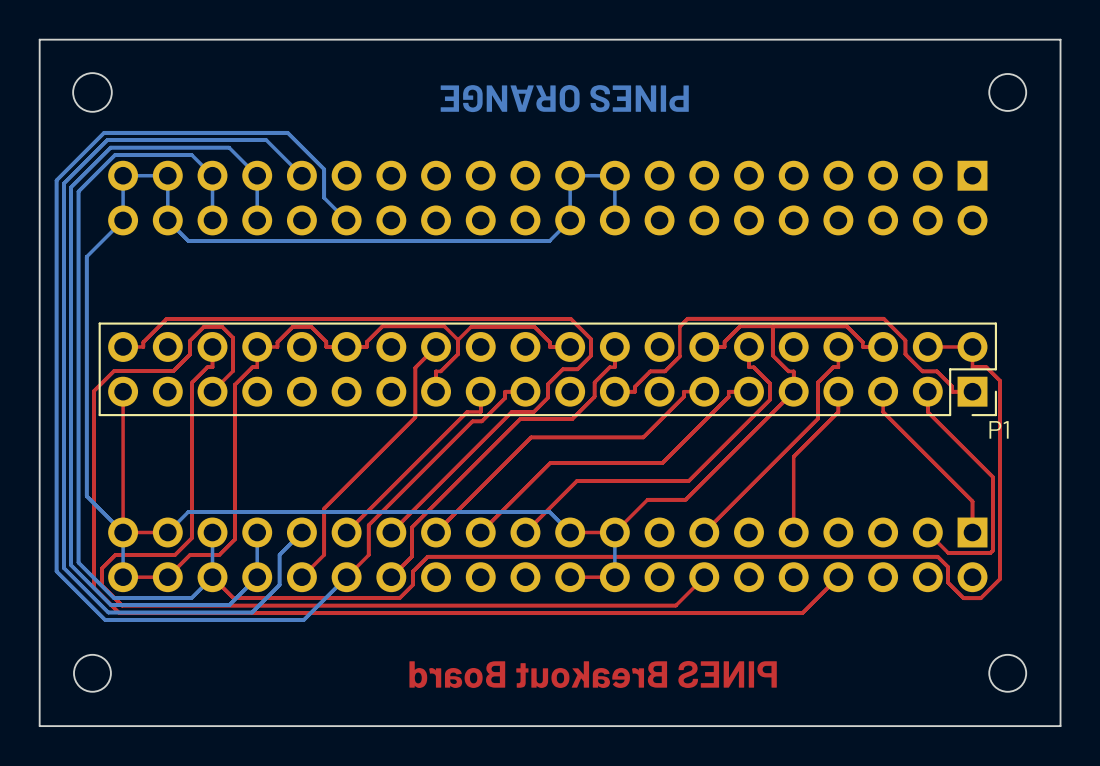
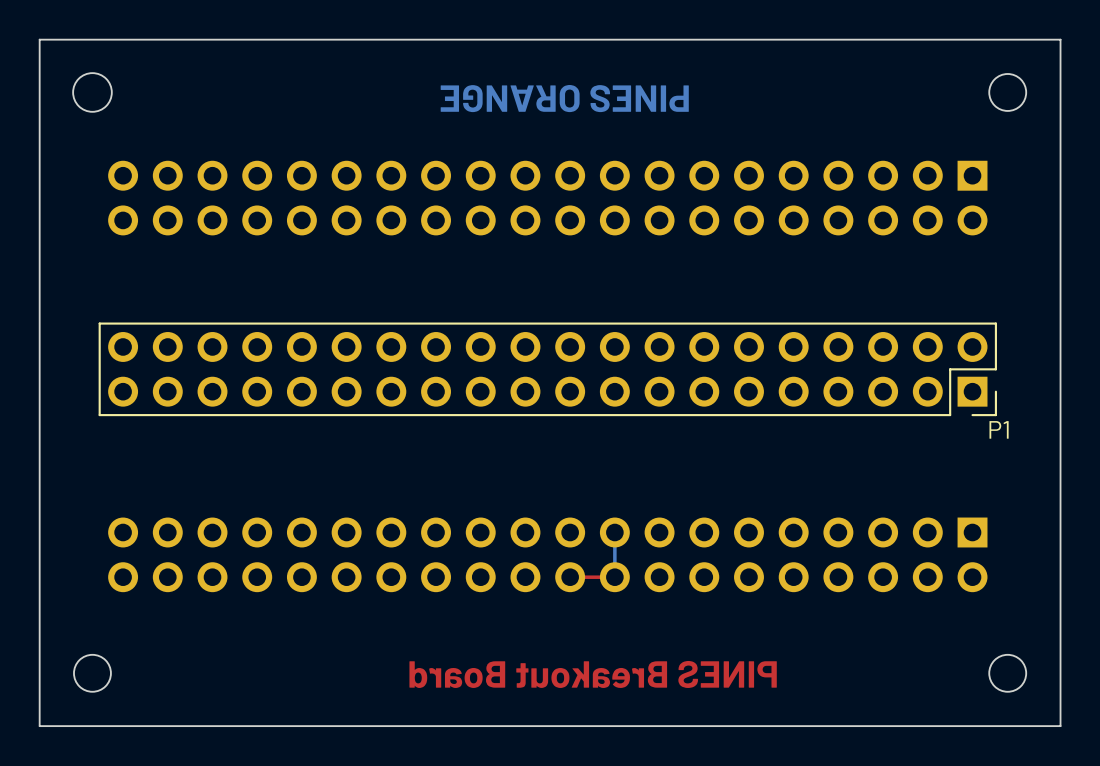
bottom track: (301, 175) (266, 140) (107, 140) (63, 183) (63, 567) (108, 612) (252, 612) (279, 585) (279, 554) (301, 532) -> none
bottom track: (212, 220) (212, 175) (191, 155) (114, 155) (78, 191) (78, 562) (113, 597) (191, 597) (212, 577) (212, 532) -> none
bottom track: (257, 220) (257, 175) (229, 147) (110, 147) (71, 187) (71, 565) (110, 605) (229, 605) (257, 577) (257, 532) -> none
bottom track: (346, 220) (324, 198) (324, 169) (287, 132) (104, 132) (56, 180) (56, 571) (104, 619) (304, 619) (346, 577) -> none
bottom track: (614, 220) (614, 175) (570, 175) (570, 220) (549, 240) (188, 240) (167, 220) (167, 175) (123, 175) (123, 220) (86, 256) (86, 496) (123, 532) (123, 577) -> none
top track: (772, 326) (772, 355) (788, 371) (793, 371) (793, 391) (685, 499) (647, 499) (614, 532) (570, 532) -> none
top track: (458, 340) (458, 354) (440, 371) (436, 371) (436, 391) -> none
top track: (458, 340) (444, 326) (382, 326) (366, 341) (366, 346) (326, 346) (326, 341) (311, 326) (293, 326) (277, 342) (277, 346) (257, 346) (257, 367) (252, 367) (234, 384) (234, 539) (219, 554) (190, 554) (167, 577) (123, 577) -> none
top track: (458, 340) (471, 326) (534, 326) (549, 342) (549, 346) (570, 346) -> none
top track: (123, 346) (143, 346) (143, 342) (166, 319) (571, 319) (590, 338) (590, 356) (577, 369) (562, 369) (547, 384) (547, 398) (533, 411) (511, 411) (391, 532) -> none
top track: (212, 346) (212, 367) (207, 367) (192, 382) (192, 537) (175, 554) (115, 554) (102, 568) (102, 585) (122, 605) (675, 605) (704, 577) -> none
top track: (436, 346) (415, 367) (415, 417) (324, 508) (324, 554) (301, 577) -> none
top track: (614, 346) (614, 367) (609, 367) (594, 382) (594, 396) (572, 419) (520, 419) (412, 527) (412, 556) (391, 577) -> none
top track: (748, 346) (748, 367) (753, 367) (770, 383) (770, 399) (688, 480) (577, 480) (525, 532) -> none
top track: (838, 346) (838, 367) (833, 367) (818, 382) (818, 418) (704, 532) -> none
top track: (883, 346) (862, 346) (862, 342) (846, 326) (740, 326) (724, 341) (724, 346) (704, 346) -> none
top track: (927, 346) (972, 346) (972, 367) (986, 367) (999, 380) (999, 579) (980, 598) (963, 598) (948, 582) (948, 567) (937, 556) (427, 556) (413, 571) (413, 584) (399, 597) (233, 597) (212, 577) -> none
top track: (123, 391) (123, 532) (167, 532) -> none
top track: (212, 391) (233, 370) (233, 337) (221, 326) (204, 326) (190, 340) (190, 354) (173, 370) (114, 370) (94, 391) (94, 587) (119, 613) (802, 613) (838, 577) -> none
top track: (480, 391) (480, 411) (467, 411) (346, 532) -> none
top track: (525, 391) (505, 391) (505, 397) (481, 421) (472, 421) (368, 525) (368, 555) (346, 577) -> none
top track: (704, 391) (684, 391) (684, 396) (643, 437) (531, 437) (436, 532) -> none
top track: (748, 391) (728, 391) (728, 396) (662, 463) (550, 463) (480, 532) -> none
top track: (838, 391) (838, 411) (793, 456) (793, 532) -> none
top track: (883, 391) (883, 411) (972, 501) (972, 532) -> none
top track: (927, 391) (927, 411) (992, 476) (992, 550) (990, 553) (948, 553) (927, 532) -> none
top track: (972, 391) (952, 391) (952, 386) (937, 371) (922, 371) (905, 354) (905, 340) (883, 318) (687, 318) (679, 326) (679, 356) (664, 371) (650, 371) (635, 386) (635, 391) (614, 391) -> none
bottom track: (570, 532) (549, 511) (188, 511) (167, 532) -> none

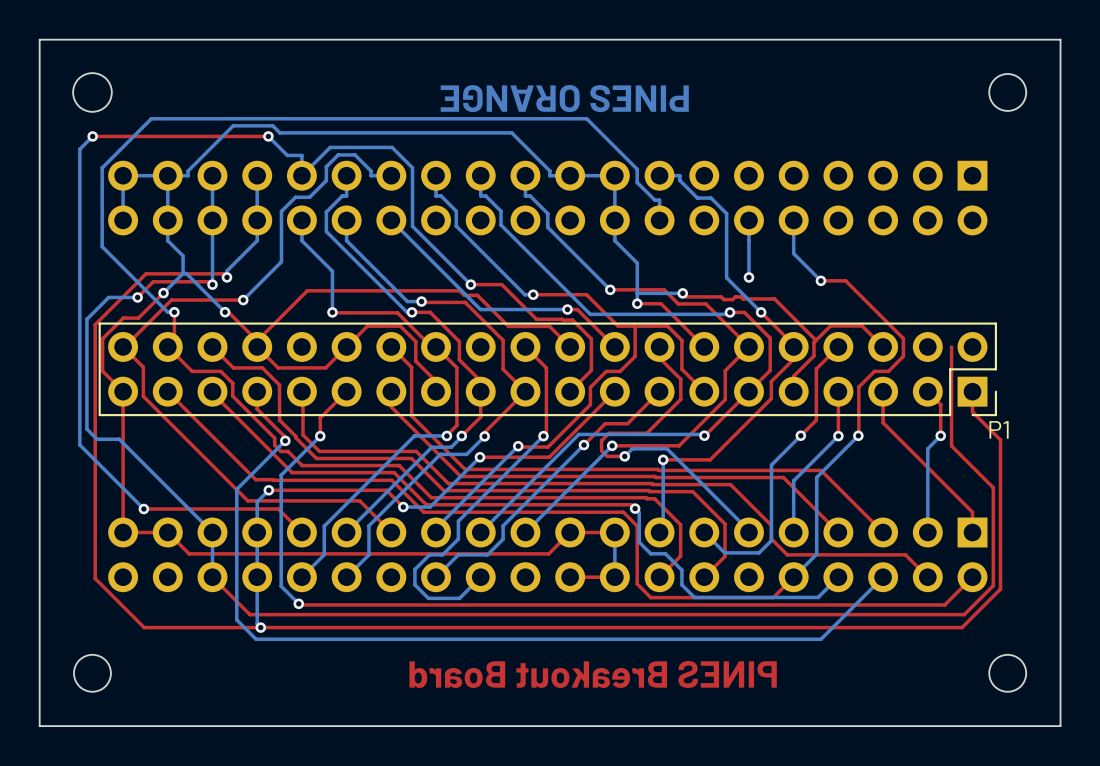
bottom track: none -> (92, 136) (79, 149) (79, 444) (143, 509)
via: none -> (92, 136)
top track: none -> (268, 136) (92, 136)
bottom track: none -> (268, 136) (287, 155) (301, 155) (301, 175) (330, 147) (392, 147) (412, 167) (412, 226) (470, 284)
via: none -> (268, 136)
bottom track: none -> (167, 175) (167, 240) (183, 255) (183, 273)
bottom track: none -> (212, 175) (212, 284)
bottom track: none -> (257, 175) (257, 240) (226, 270) (226, 277)
bottom track: none -> (346, 175) (346, 195) (342, 195) (326, 212) (326, 231) (407, 312) (411, 312)
bottom track: none -> (391, 175) (371, 175) (371, 171) (355, 154) (338, 154) (326, 166) (326, 180) (309, 197) (295, 197) (281, 211) (281, 261) (243, 300)
bottom track: none -> (436, 175) (436, 195) (441, 195) (456, 211) (456, 226) (524, 294) (533, 294)
bottom track: none -> (480, 175) (480, 195) (485, 195) (501, 211) (501, 225) (590, 314) (728, 314) (729, 312)
bottom track: none -> (525, 175) (525, 195) (530, 195) (547, 213) (547, 227) (610, 289)
bottom track: none -> (659, 175) (679, 175) (679, 180) (697, 198) (711, 198) (726, 213) (726, 277) (761, 312)
bottom track: none -> (123, 220) (123, 175) (188, 175) (188, 171) (233, 125) (272, 125) (279, 132) (511, 132) (549, 171) (549, 175) (614, 175) (614, 240) (637, 263) (637, 303)
bottom track: none -> (301, 220) (301, 240) (332, 271) (332, 312)
bottom track: none -> (346, 220) (346, 240) (407, 301) (421, 301)
bottom track: none -> (391, 220) (480, 309) (567, 309)
bottom track: none -> (659, 220) (659, 200) (654, 200) (637, 182) (637, 169) (586, 118) (151, 118) (102, 167) (102, 246) (167, 312) (174, 312)
bottom track: none -> (748, 220) (748, 277)
bottom track: none -> (793, 220) (793, 253) (820, 280)
bottom track: none -> (183, 273) (163, 293)
bottom track: none -> (183, 273) (186, 273) (225, 312)
top track: none -> (226, 277) (223, 273) (146, 273) (95, 324) (95, 578) (144, 627) (962, 627) (1000, 589) (1000, 439) (972, 411) (972, 391)
via: none -> (226, 277)
via: none -> (748, 277)
top track: none -> (820, 280) (845, 280) (903, 338) (903, 356) (888, 371) (874, 371) (858, 387) (858, 435)
via: none -> (820, 280)
top track: none -> (212, 284) (209, 281) (153, 281) (137, 297)
via: none -> (212, 284)
top track: none -> (470, 284) (501, 284) (536, 319) (572, 320) (591, 338) (591, 370) (570, 391)
via: none -> (470, 284)
top track: none -> (610, 289) (664, 289) (678, 303) (705, 303) (748, 346) (725, 370) (725, 399) (679, 445) (612, 445)
via: none -> (610, 289)
top track: none -> (163, 293) (138, 318) (123, 318) (102, 338) (102, 371) (123, 391) (123, 532) (167, 532) (189, 553) (548, 553) (570, 532) (614, 532)
via: none -> (163, 293)
top track: none -> (682, 293) (686, 296) (721, 296) (723, 299) (732, 299) (735, 296) (742, 298) (774, 298) (816, 340)
bottom track: none -> (682, 293) (637, 293)
via: none -> (682, 293)
top track: none -> (533, 294) (586, 294) (618, 326) (667, 326) (681, 340) (681, 369) (704, 391)
via: none -> (533, 294)
bottom track: none -> (137, 297) (108, 297) (86, 319) (86, 429) (97, 439) (119, 439) (212, 532) (212, 577)
via: none -> (137, 297)
top track: none -> (243, 300) (171, 300) (123, 346) (143, 367) (143, 396) (247, 500) (359, 500) (391, 532)
via: none -> (243, 300)
top track: none -> (421, 301) (465, 302) (503, 340) (503, 369) (525, 391) (484, 432) (484, 436)
via: none -> (421, 301)
top track: none -> (637, 303) (661, 303) (704, 346)
via: none -> (637, 303)
top track: none -> (567, 309) (577, 309) (614, 346)
via: none -> (567, 309)
top track: none -> (174, 312) (174, 340) (167, 346) (192, 371) (220, 371) (232, 383) (232, 396) (274, 438) (274, 445) (280, 451) (288, 451) (302, 465) (399, 465) (431, 497) (654, 498) (680, 524) (680, 556) (659, 577)
via: none -> (174, 312)
top track: none -> (225, 312) (228, 312) (257, 340)
via: none -> (225, 312)
top track: none -> (332, 312) (397, 312) (431, 346) (436, 346) (456, 367) (456, 425) (446, 435)
via: none -> (332, 312)
top track: none -> (411, 312) (430, 312) (459, 341) (459, 359) (480, 381) (480, 417) (461, 435)
via: none -> (411, 312)
top track: none -> (729, 312) (744, 312) (770, 338) (770, 370) (704, 435)
via: none -> (729, 312)
top track: none -> (761, 312) (793, 344) (793, 359) (771, 381) (771, 398) (710, 459) (663, 459)
via: none -> (761, 312)
top track: none -> (635, 326) (635, 356) (620, 371) (606, 371) (590, 387) (590, 404) (548, 447) (518, 446)
top track: none -> (257, 340) (257, 346) (278, 367) (325, 367) (367, 326) (400, 326) (415, 341) (415, 361) (436, 381) (436, 391)
top track: none -> (257, 340) (307, 290) (459, 290) (464, 295) (477, 295) (508, 326) (549, 326) (570, 346)
top track: none -> (816, 340) (813, 342) (813, 355) (793, 376) (793, 391)
top track: none -> (816, 340) (830, 325) (862, 325) (883, 346)
top track: none -> (212, 346) (233, 367) (262, 367) (279, 385) (279, 420) (316, 458) (411, 458) (443, 490) (692, 491) (724, 523) (724, 556) (704, 577)
top track: none -> (391, 346) (411, 367) (411, 415) (465, 469) (821, 470) (883, 532)
top track: none -> (525, 346) (546, 367) (546, 433) (543, 436)
top track: none -> (659, 346) (659, 358) (680, 379) (680, 399) (646, 433) (609, 433) (601, 440) (601, 450) (607, 456) (624, 456)
top track: none -> (838, 346) (816, 369) (816, 420) (800, 435)
top track: none -> (951, 346) (951, 445) (993, 487) (993, 585) (964, 614) (249, 614) (212, 577)
top track: none -> (167, 391) (255, 479) (391, 480) (423, 512) (623, 512) (637, 526) (637, 584) (650, 597) (773, 597) (793, 577)
top track: none -> (212, 391) (292, 472) (394, 472) (426, 504) (631, 504) (635, 508)
top track: none -> (257, 391) (257, 409) (285, 437) (285, 440)
top track: none -> (301, 391) (302, 434) (319, 451) (416, 451) (448, 483) (730, 484) (771, 525) (771, 538) (787, 554) (905, 554) (927, 577)
top track: none -> (346, 391) (320, 418) (320, 436)
top track: none -> (391, 391) (391, 407) (460, 476) (783, 477) (838, 532)
top track: none -> (614, 391) (549, 457) (480, 457)
top track: none -> (659, 391) (627, 423) (605, 423) (583, 445)
top track: none -> (838, 391) (838, 436)
top track: none -> (883, 391) (883, 422) (972, 512) (972, 532)
top track: none -> (927, 391) (940, 404) (940, 435)
bottom track: none -> (446, 435) (414, 435) (324, 526) (324, 554) (301, 577)
via: none -> (446, 435)
bottom track: none -> (461, 435) (451, 447) (431, 447) (346, 532)
via: none -> (461, 435)
bottom track: none -> (704, 435) (578, 434) (480, 532)
via: none -> (704, 435)
bottom track: none -> (800, 435) (771, 465) (771, 540) (759, 552) (724, 552) (704, 532)
via: none -> (800, 435)
bottom track: none -> (858, 435) (816, 477) (816, 554) (793, 577)
via: none -> (858, 435)
bottom track: none -> (940, 435) (927, 448) (927, 532)
via: none -> (940, 435)
bottom track: none -> (320, 436) (281, 475) (281, 586) (298, 603)
via: none -> (320, 436)
bottom track: none -> (484, 436) (466, 454) (440, 454) (368, 525) (368, 554) (346, 577)
via: none -> (484, 436)
bottom track: none -> (543, 436) (458, 521) (458, 539) (442, 554) (429, 554) (414, 569) (414, 584) (428, 598) (459, 598) (480, 577)
via: none -> (543, 436)
bottom track: none -> (838, 436) (793, 480) (793, 532)
via: none -> (838, 436)
bottom track: none -> (285, 440) (236, 489) (236, 619) (256, 639) (821, 639) (883, 577)
via: none -> (285, 440)
bottom track: none -> (583, 445) (503, 525) (503, 539) (487, 554) (458, 554) (436, 577)
via: none -> (583, 445)
bottom track: none -> (612, 445) (525, 532)
via: none -> (612, 445)
bottom track: none -> (518, 446) (436, 528) (436, 532)
via: none -> (518, 446)
bottom track: none -> (624, 456) (632, 448) (667, 448) (748, 532)
via: none -> (624, 456)
bottom track: none -> (480, 457) (430, 507) (403, 507)
via: none -> (480, 457)
bottom track: none -> (663, 459) (663, 528) (659, 532)
via: none -> (663, 459)
top track: none -> (268, 490) (386, 490) (403, 507)
bottom track: none -> (268, 490) (257, 501) (257, 624) (260, 627)
via: none -> (268, 490)
via: none -> (403, 507)
bottom track: none -> (635, 508) (639, 512) (639, 542) (650, 553) (665, 553) (681, 570) (681, 584) (694, 597) (818, 597) (838, 577)
via: none -> (635, 508)
top track: none -> (143, 509) (278, 509) (301, 532)
via: none -> (143, 509)
top track: none -> (972, 577) (944, 604) (298, 603)
via: none -> (298, 603)
via: none -> (260, 627)

